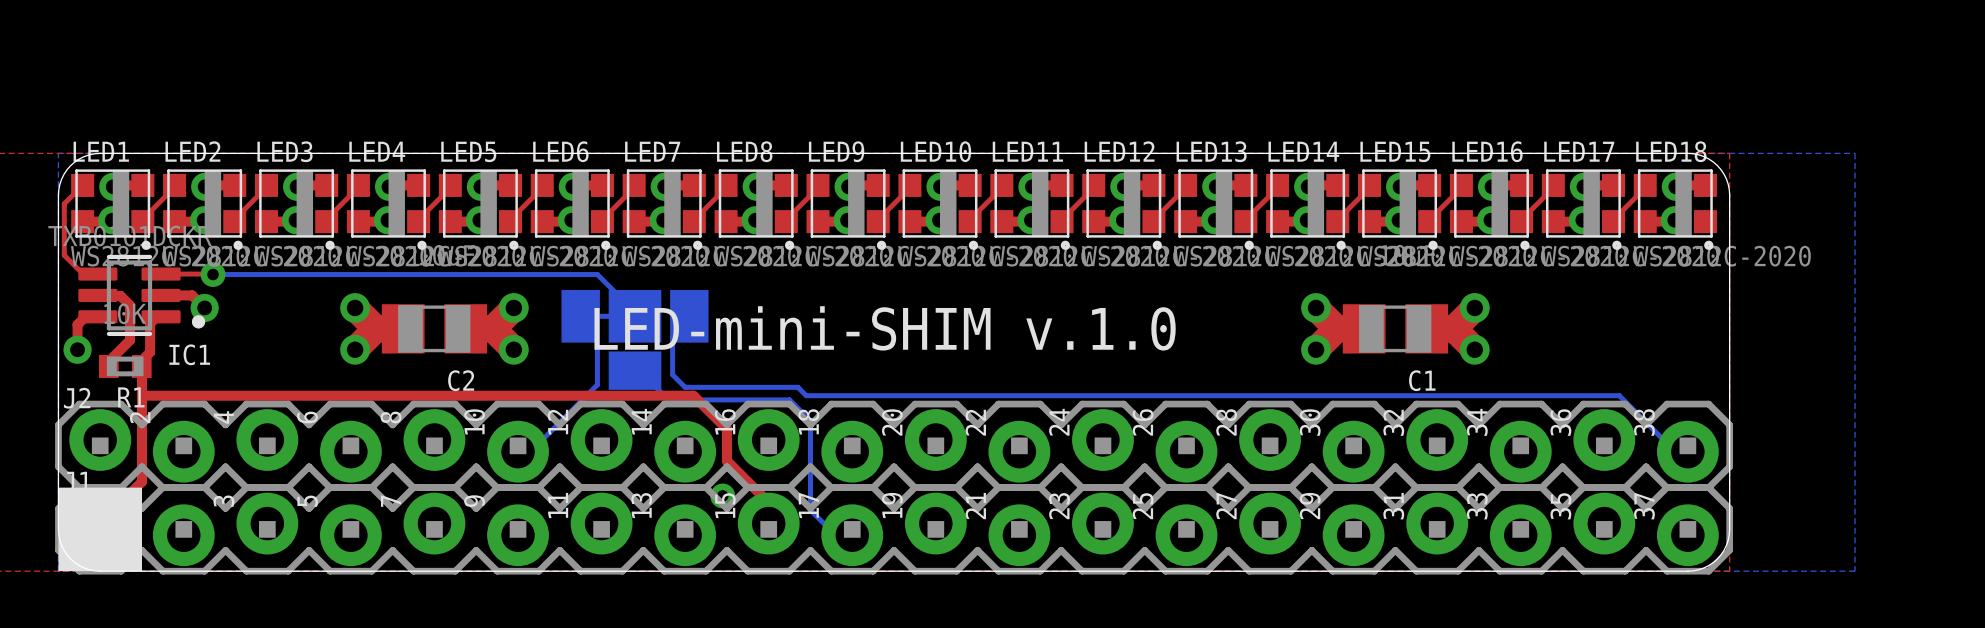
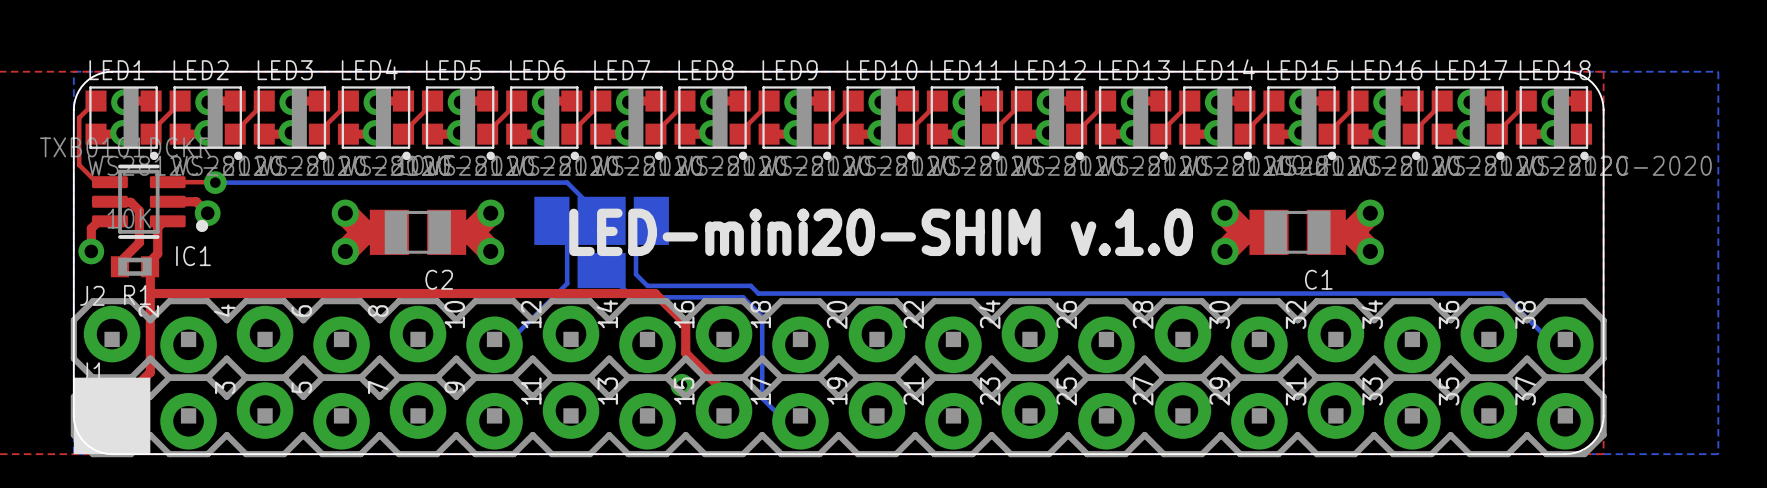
text: LED-mini-SHIM v.1.0 (885, 328) -> LED-mini20-SHIM v.1.0 (881, 232)

